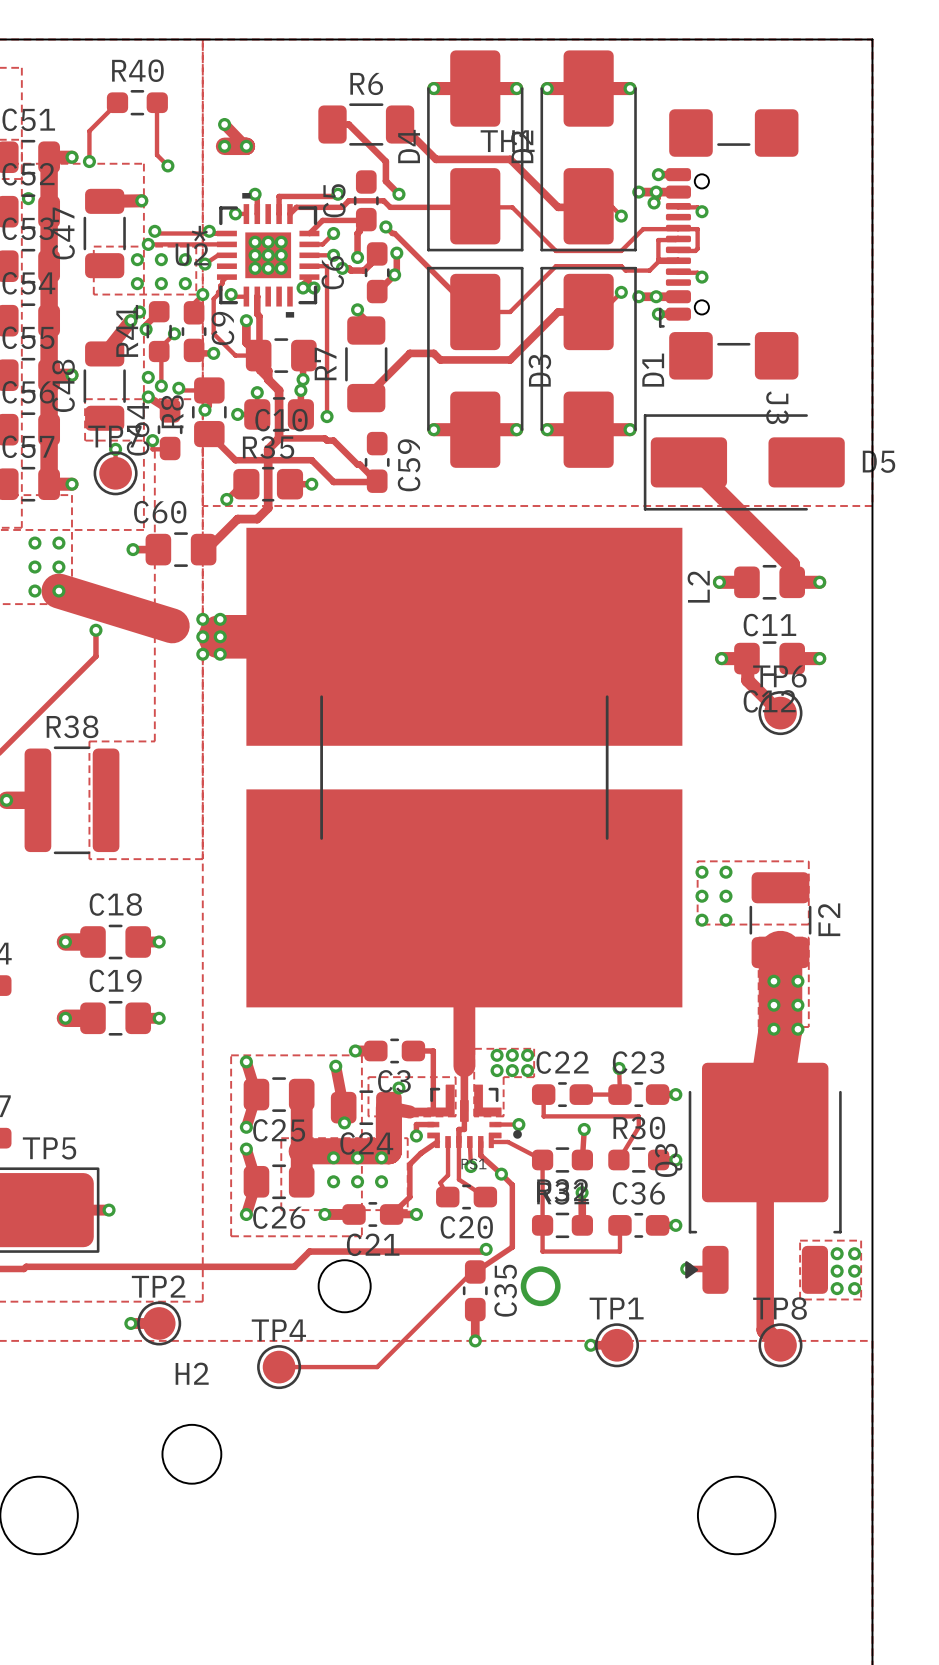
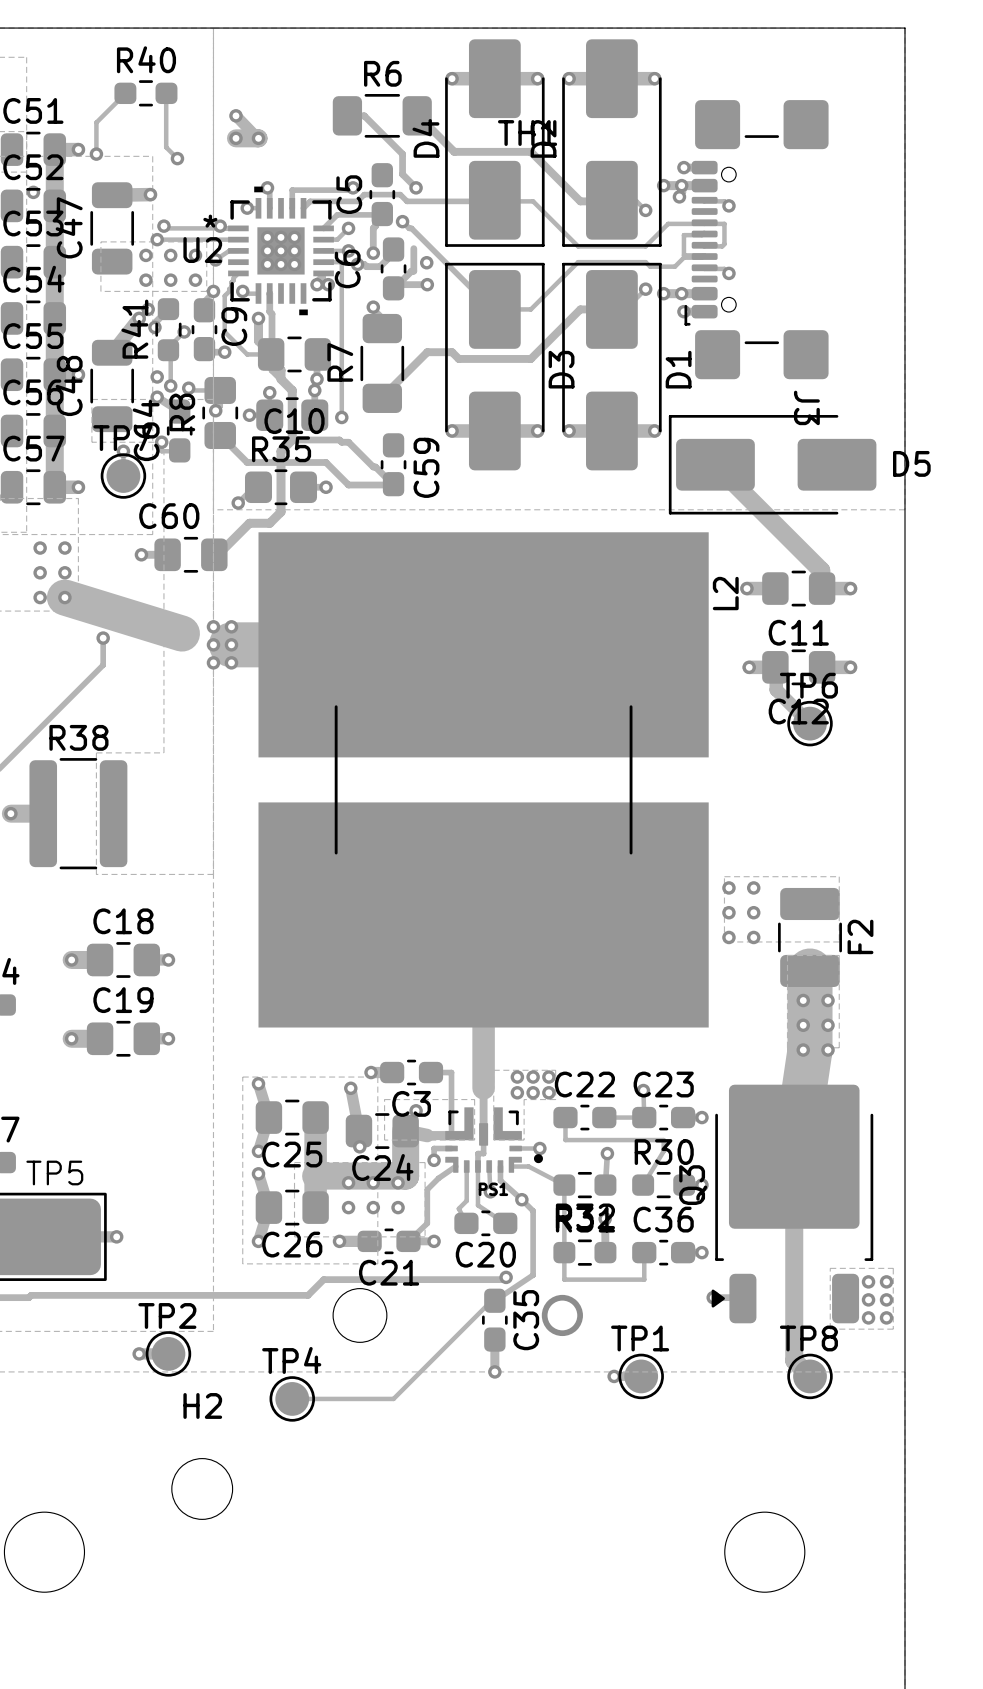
via: (396, 253) -> none
via: none -> (426, 262)
via: (394, 274) -> none
track: none -> (398, 284) (427, 284) (398, 284)
via: none -> (427, 284)

